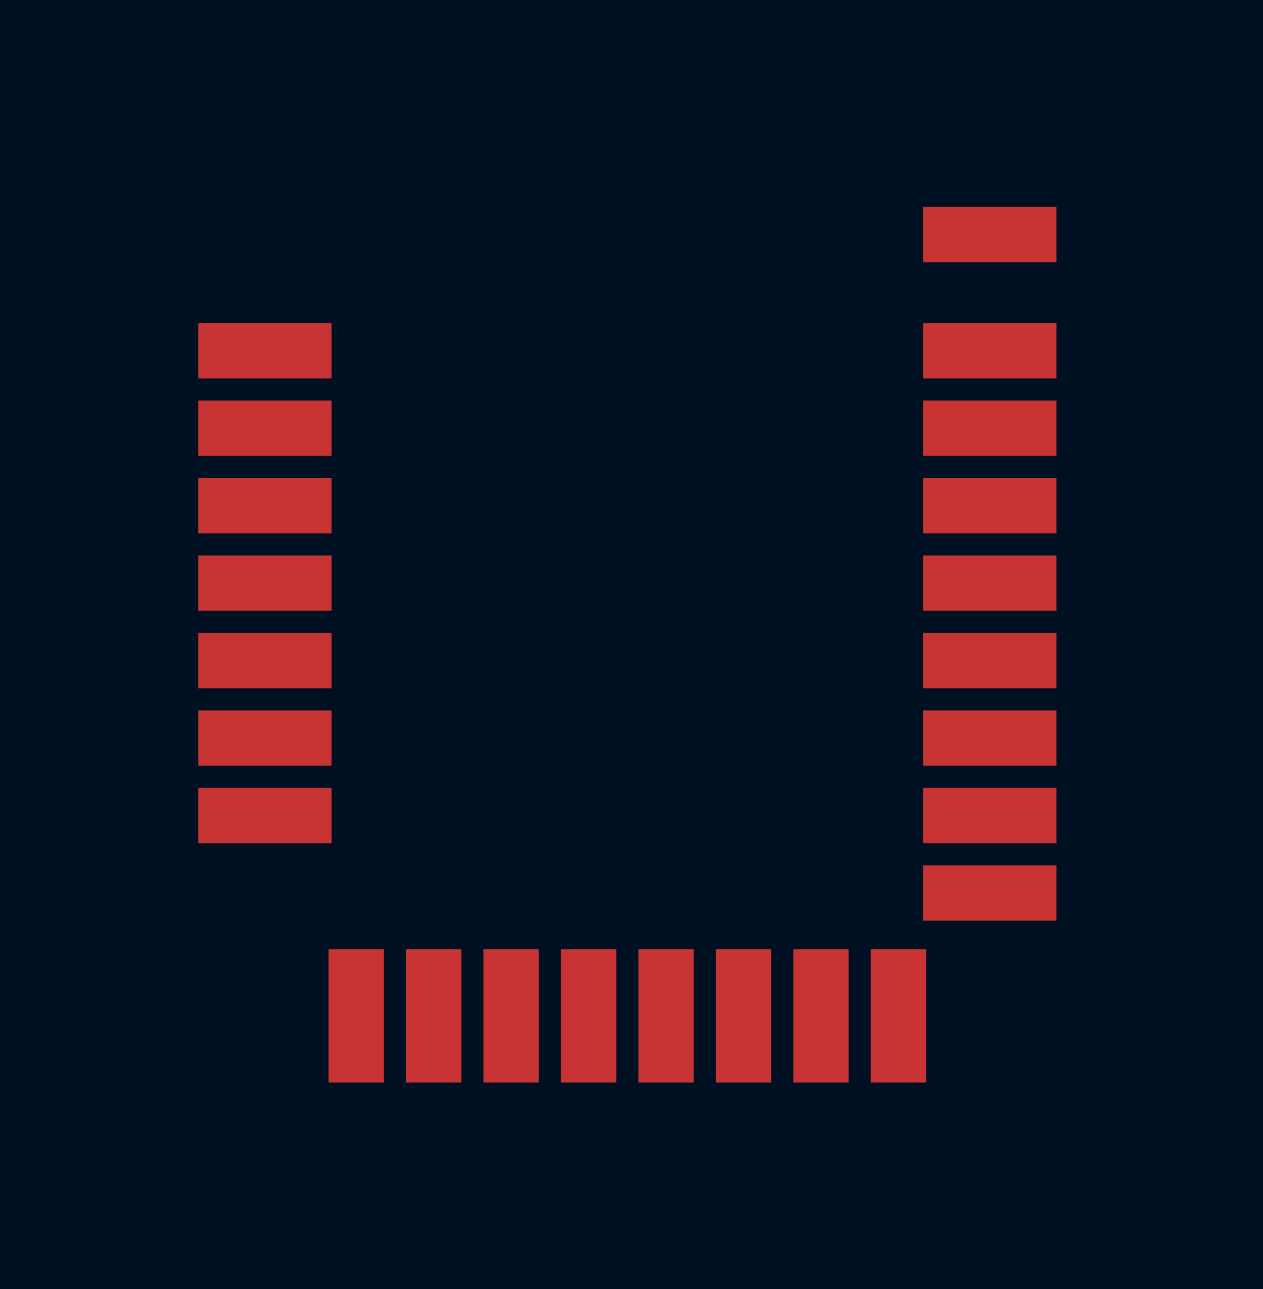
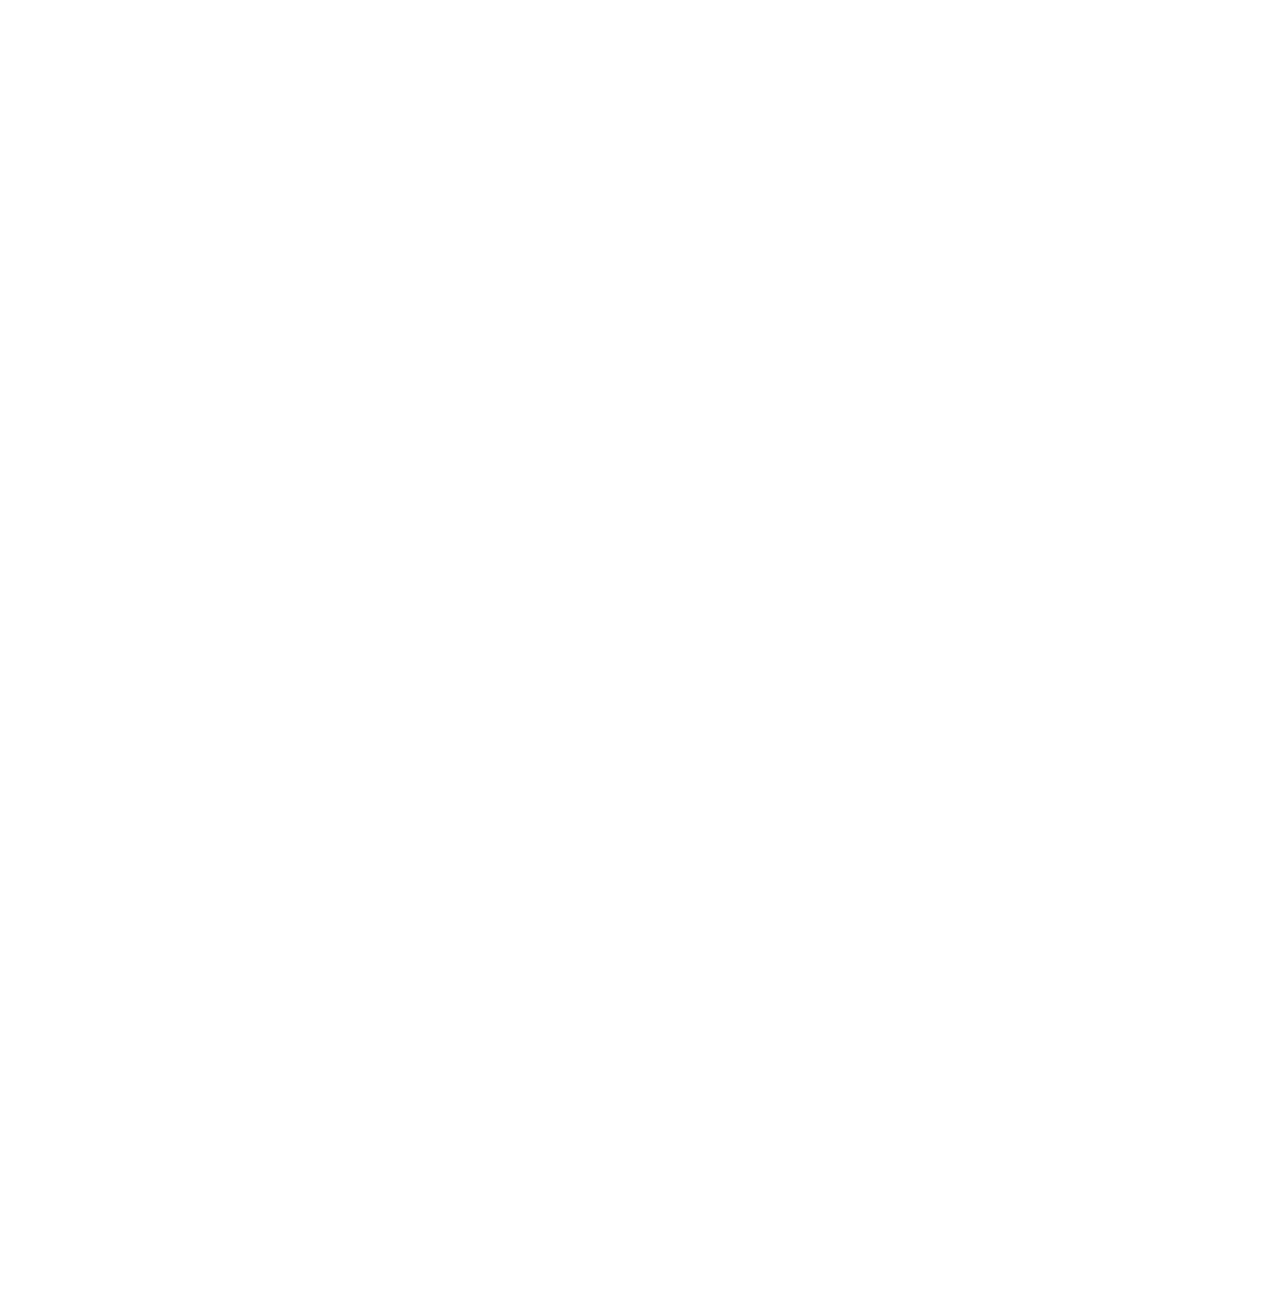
part: (627, 644) -> none

